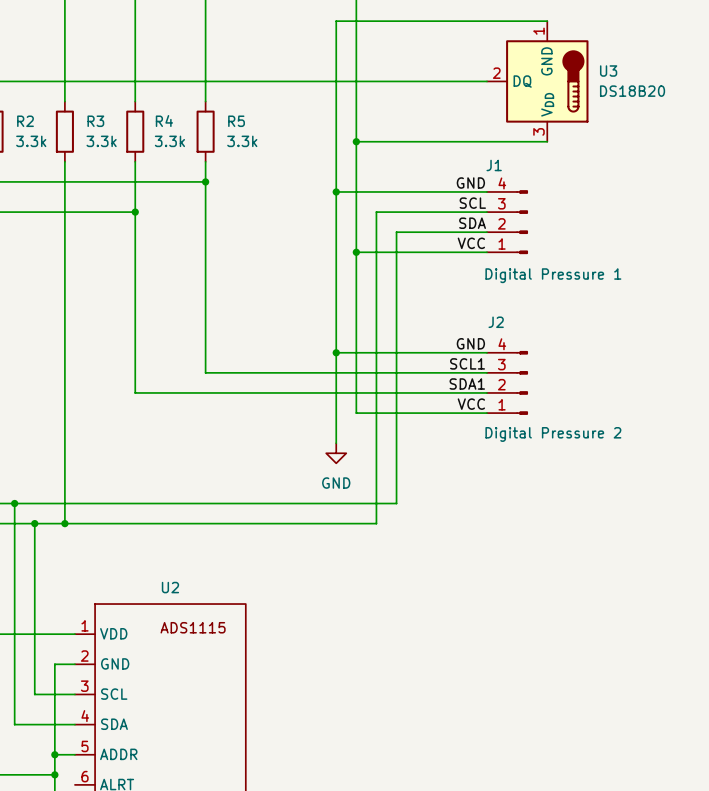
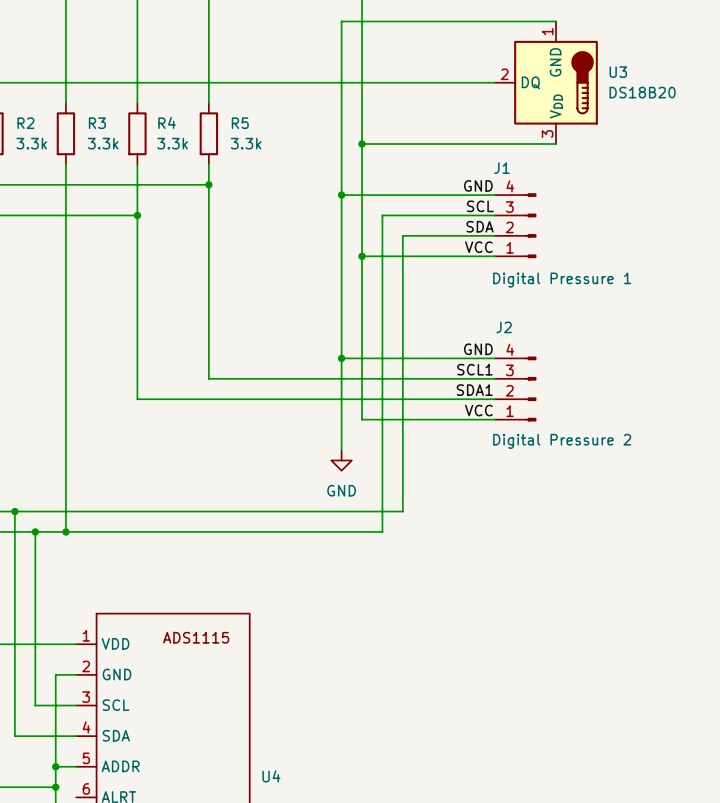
U2 name: U2 (170, 587) -> U4 (271, 776)

